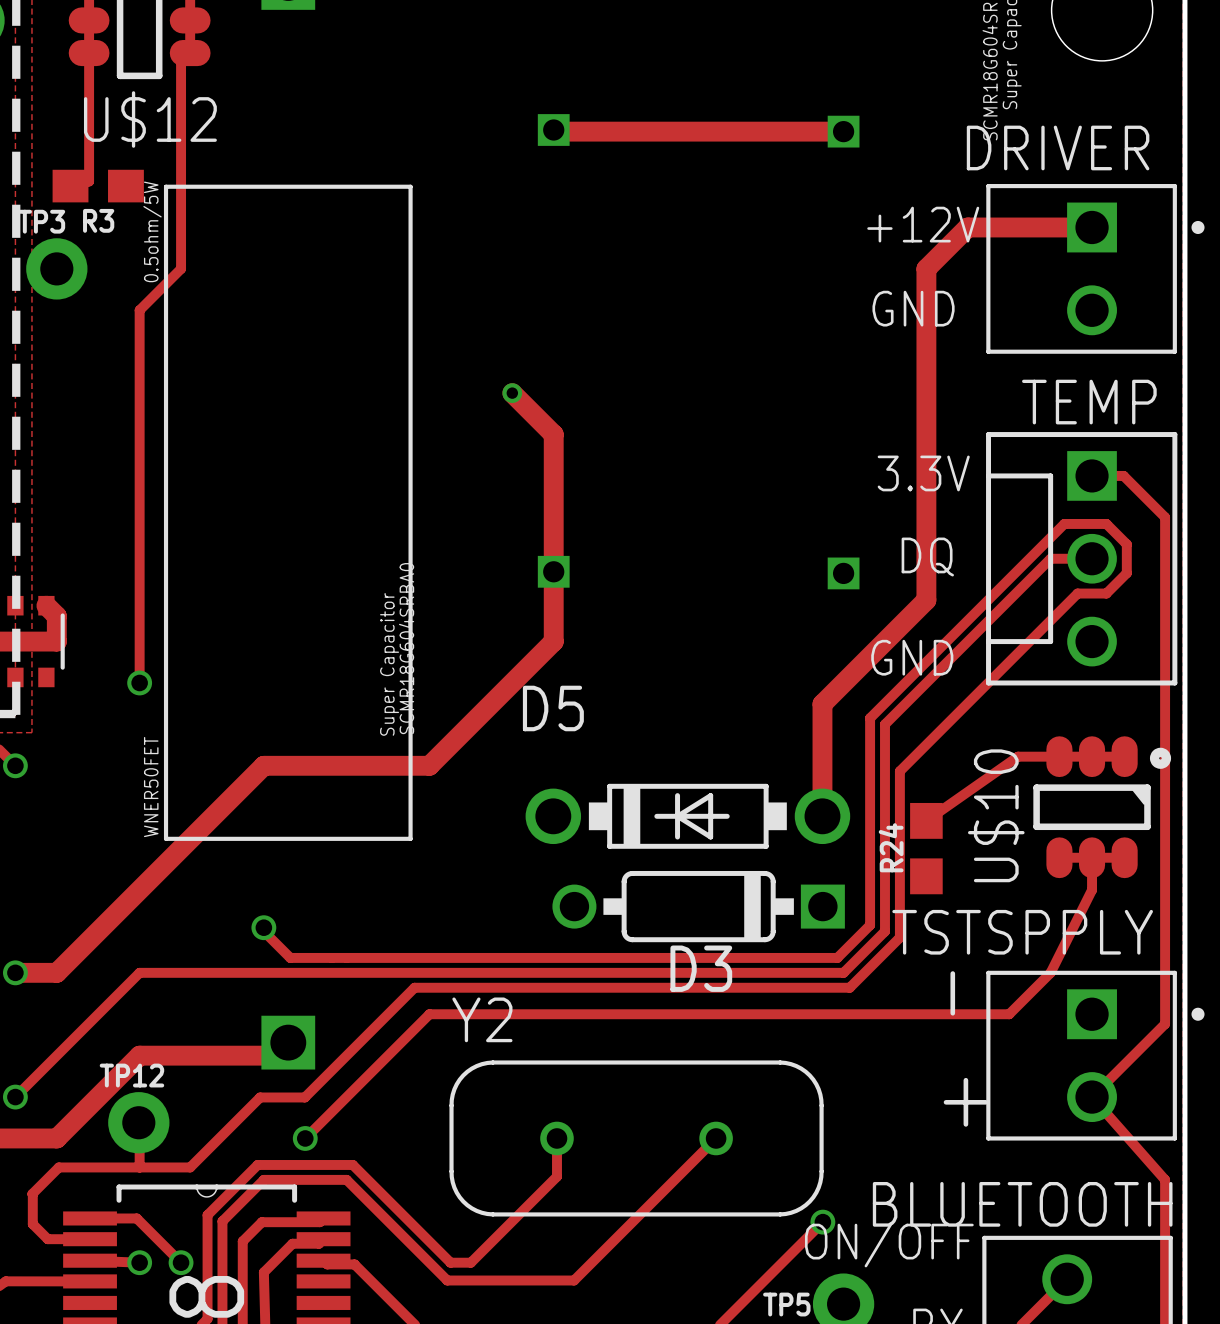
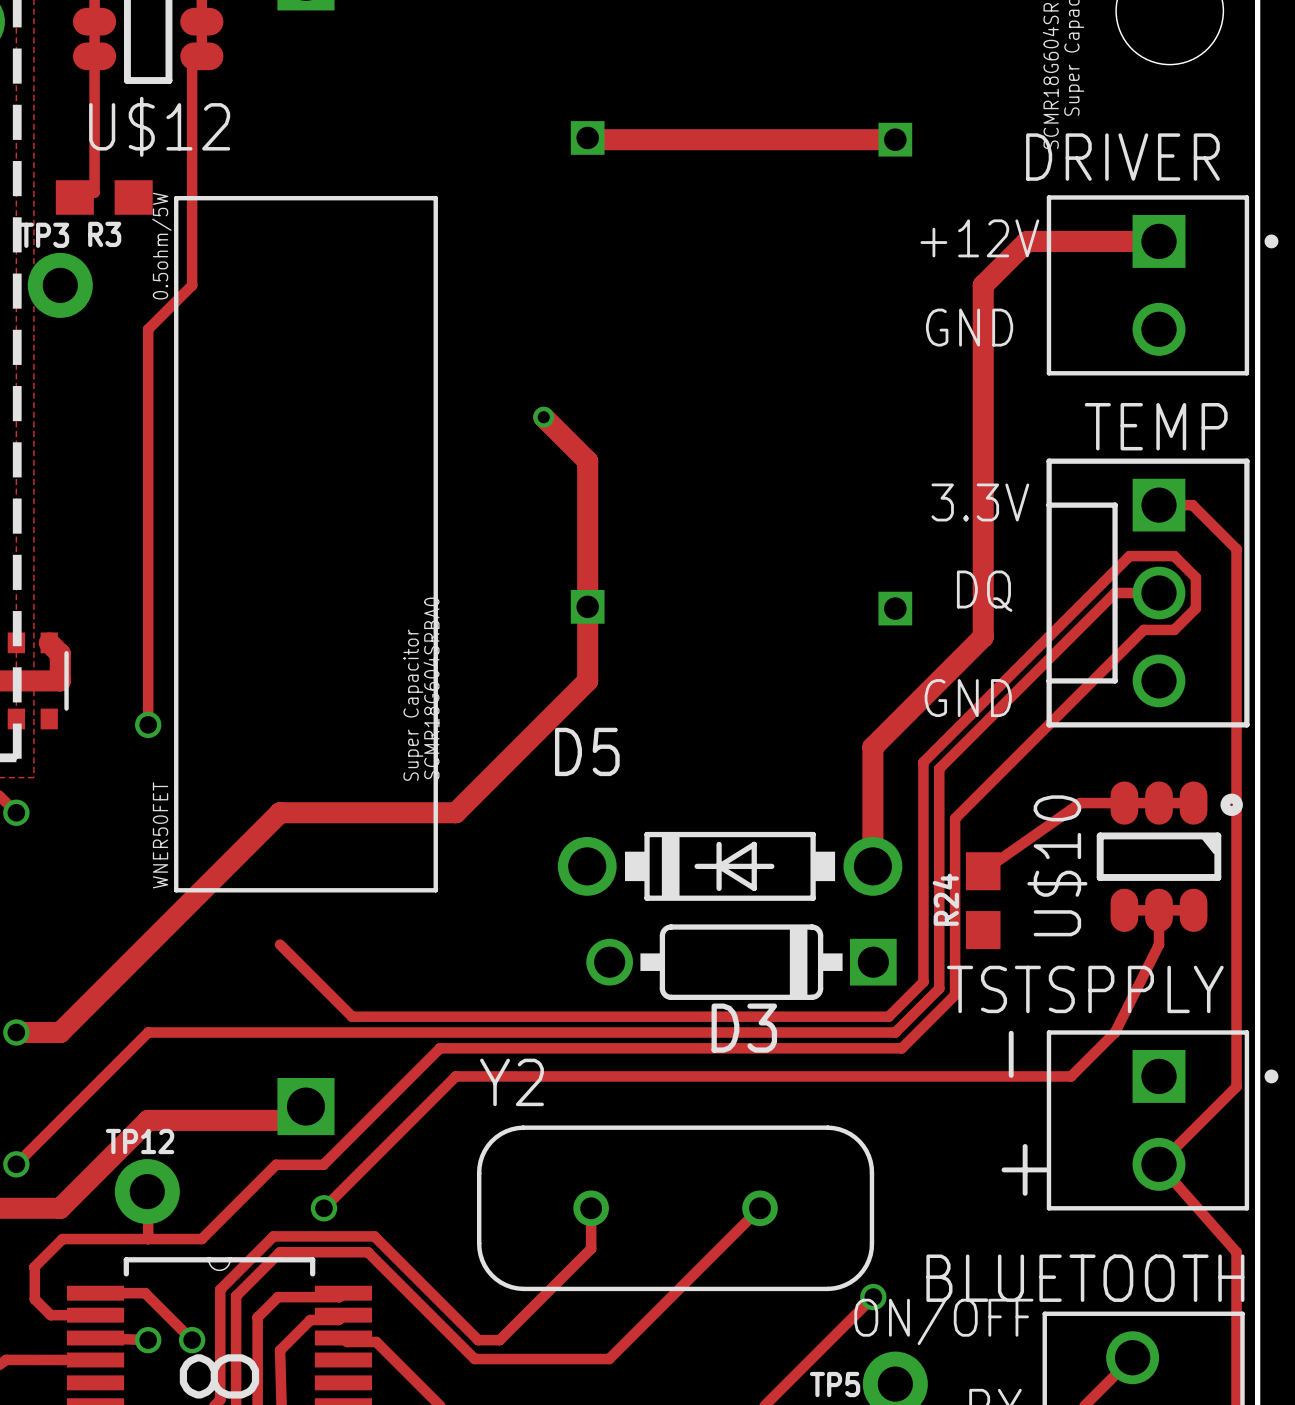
track: (263, 927) (263, 931) (290, 957) (331, 957) -> (280, 944) (352, 1016)
via: (263, 927) -> none

